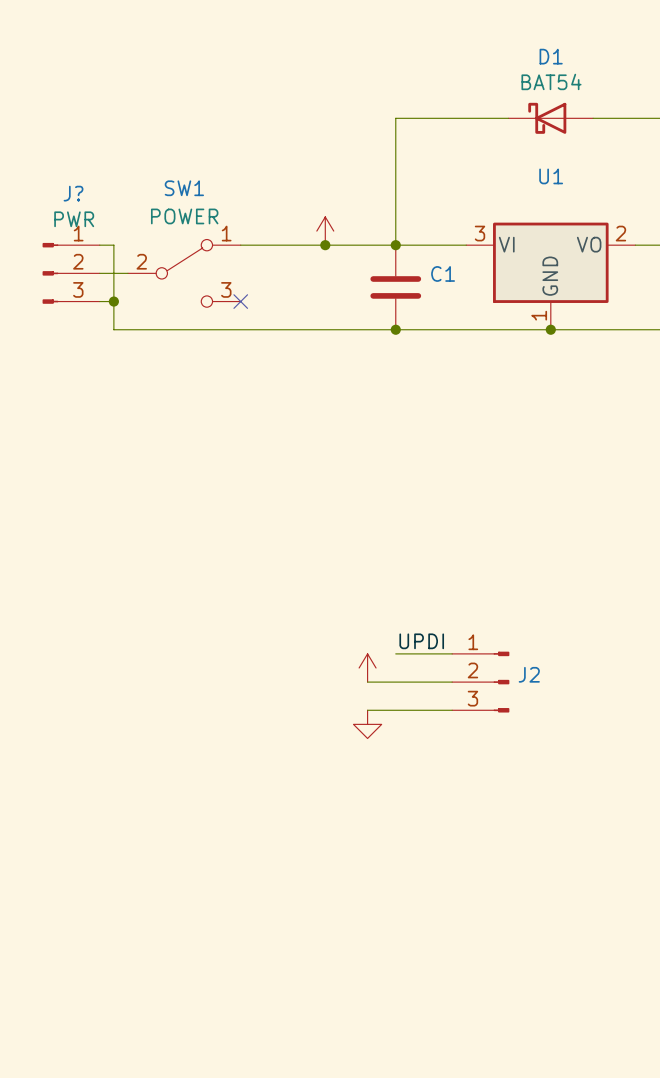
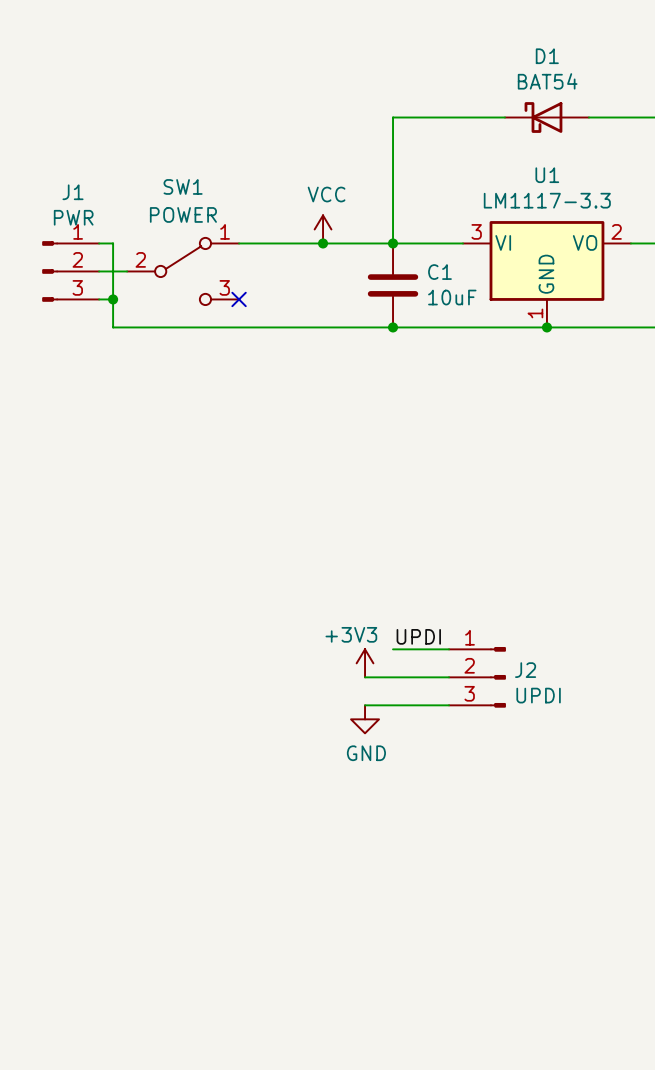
J? name: J? (73, 193) -> J1 (73, 192)
power symbol text: none -> VCC (326, 194)
U1 value: none -> LM1117-3.3 (547, 200)
C1 value: none -> 10uF (452, 297)
power symbol text: none -> +3V3 (351, 634)
J2 value: none -> UPDI (538, 695)
power symbol text: none -> GND (366, 753)

